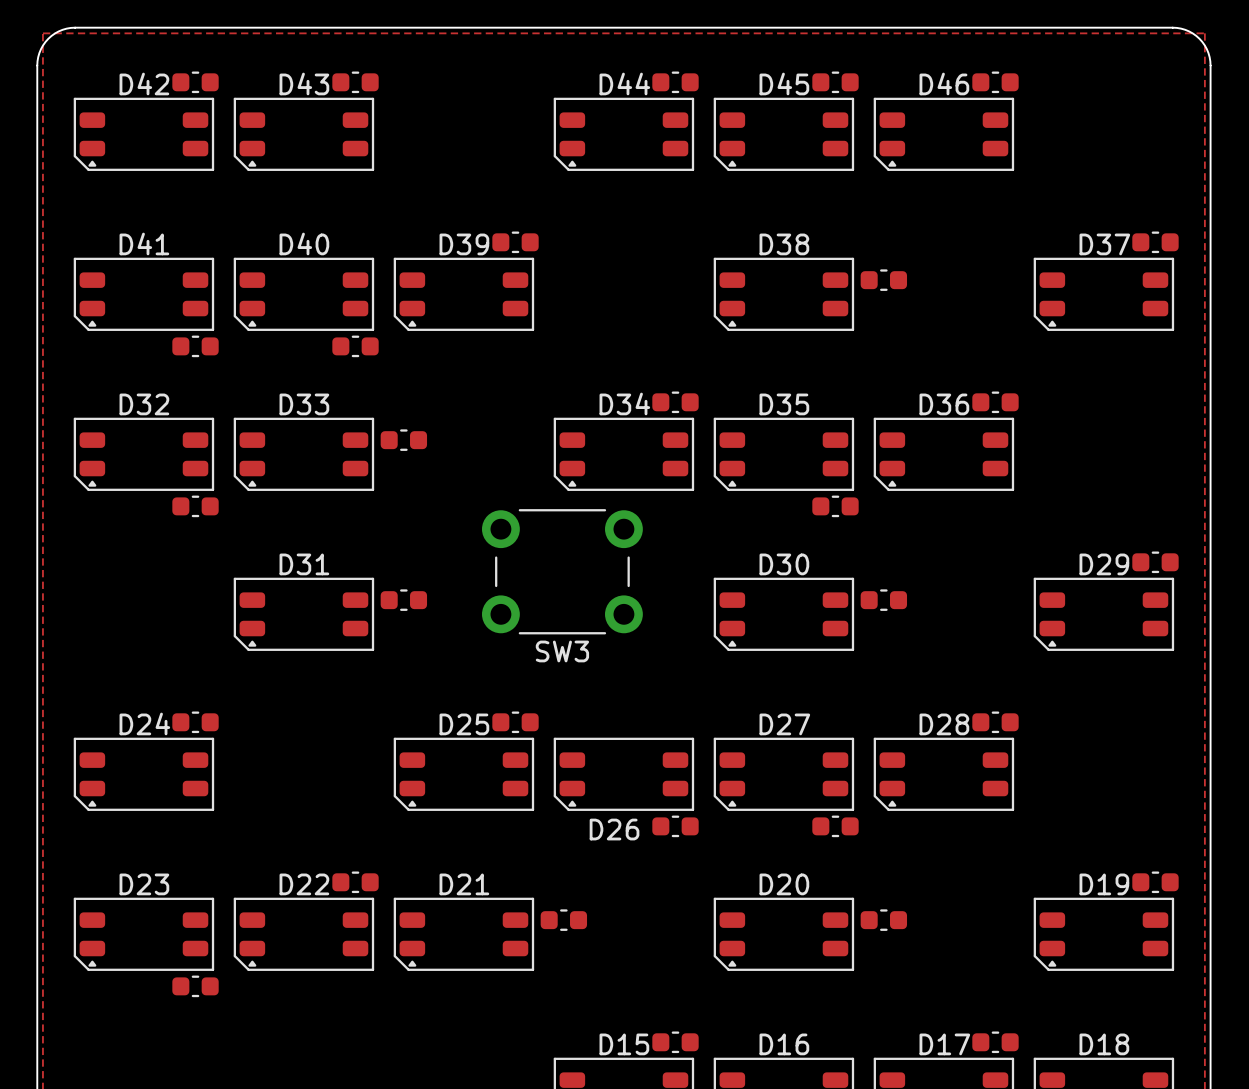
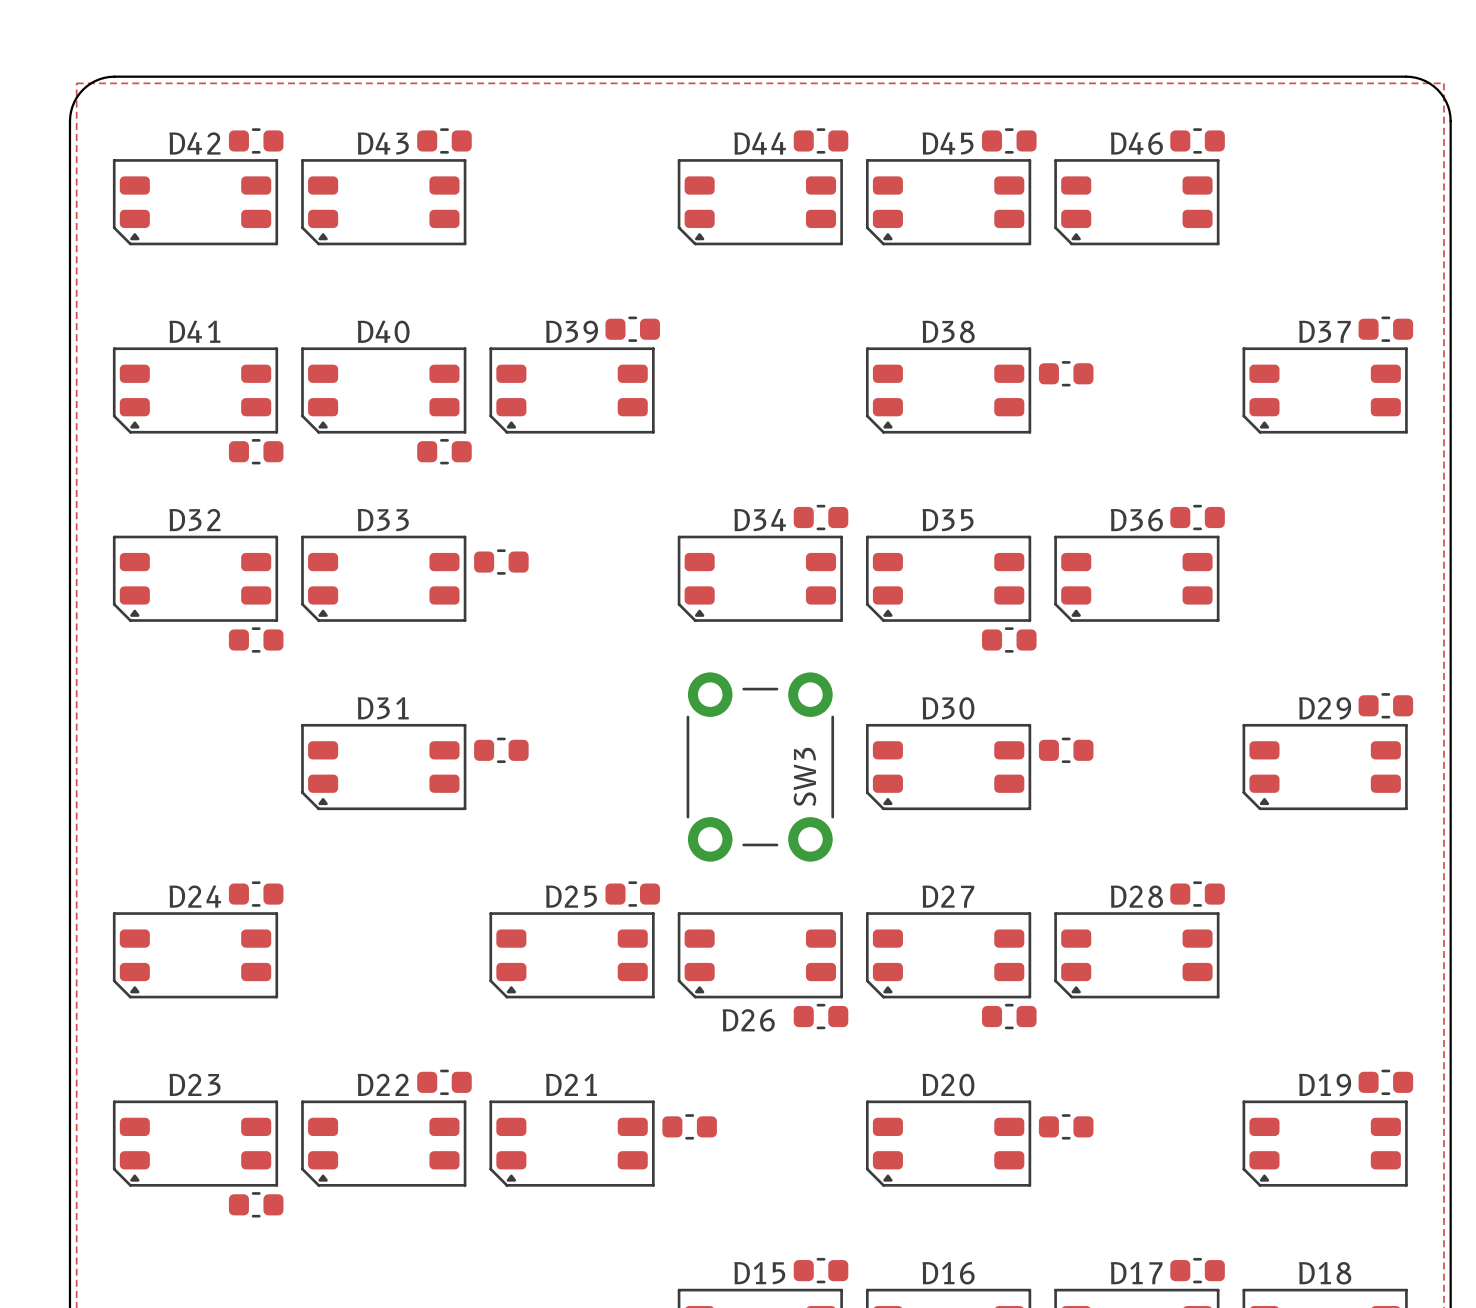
SW3 rotation: 0° (562, 571) -> 90° clockwise (760, 767)
SW3 name position: SW3 (562, 651) -> SW3 (804, 776)

